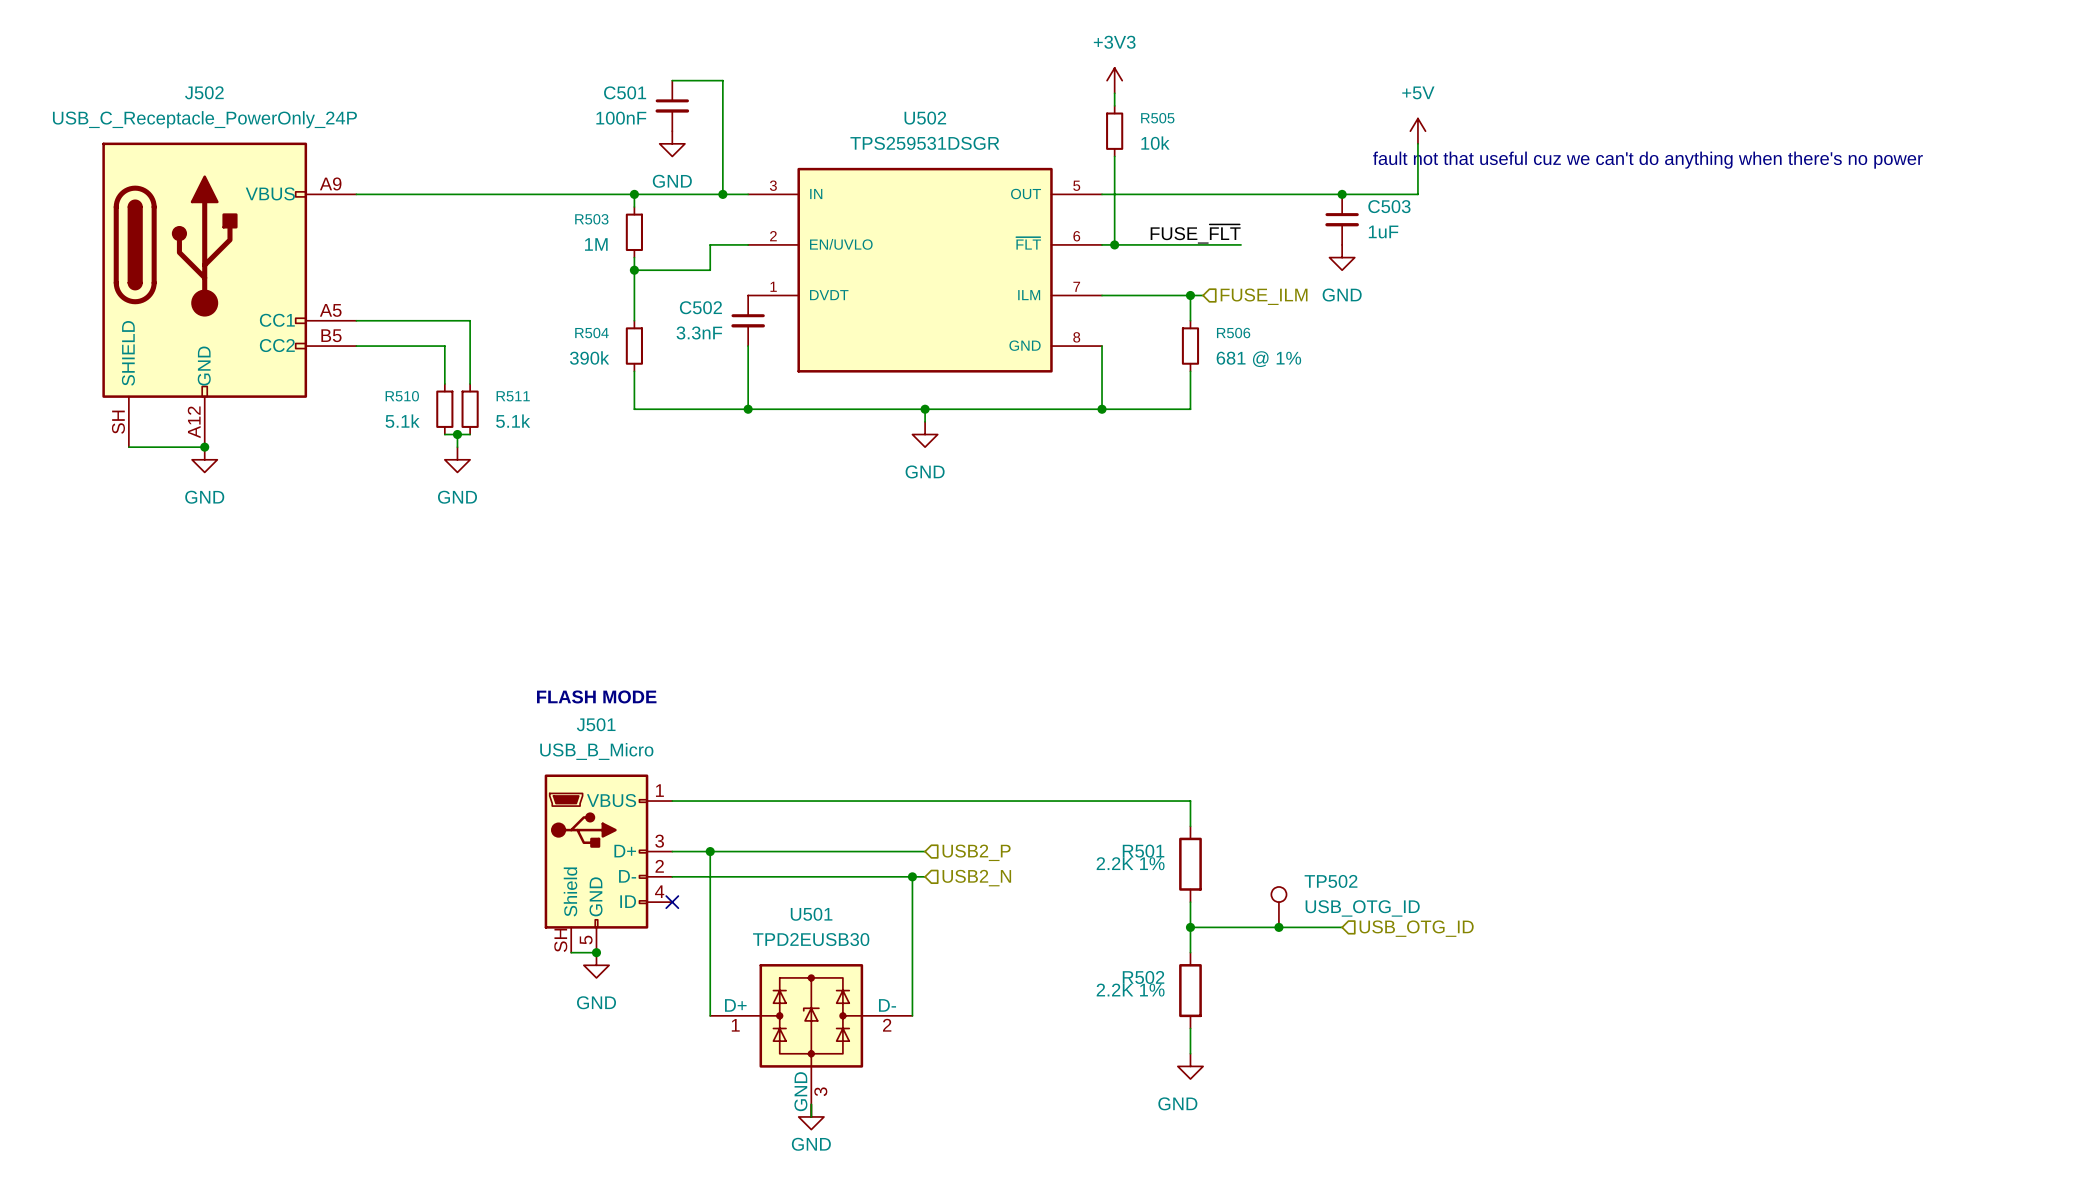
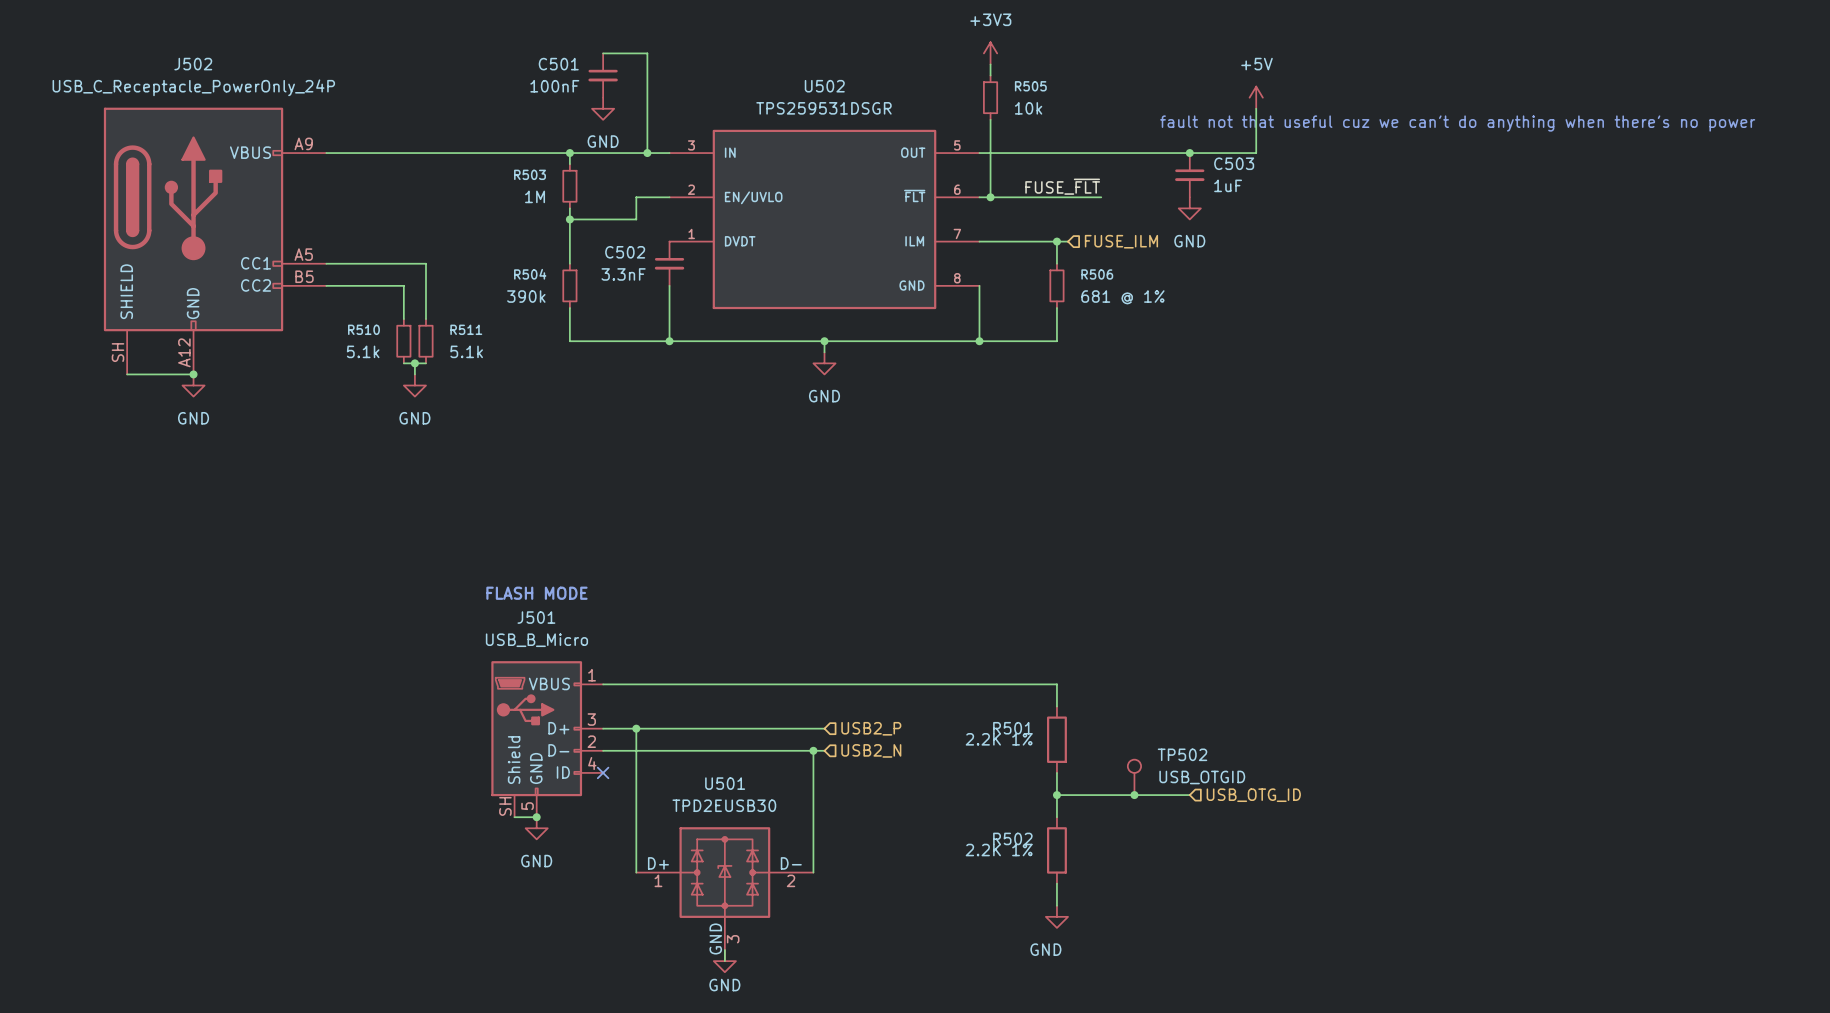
TP502 value: USB_OTG_ID (1362, 908) -> USB_OTGID (1202, 777)

